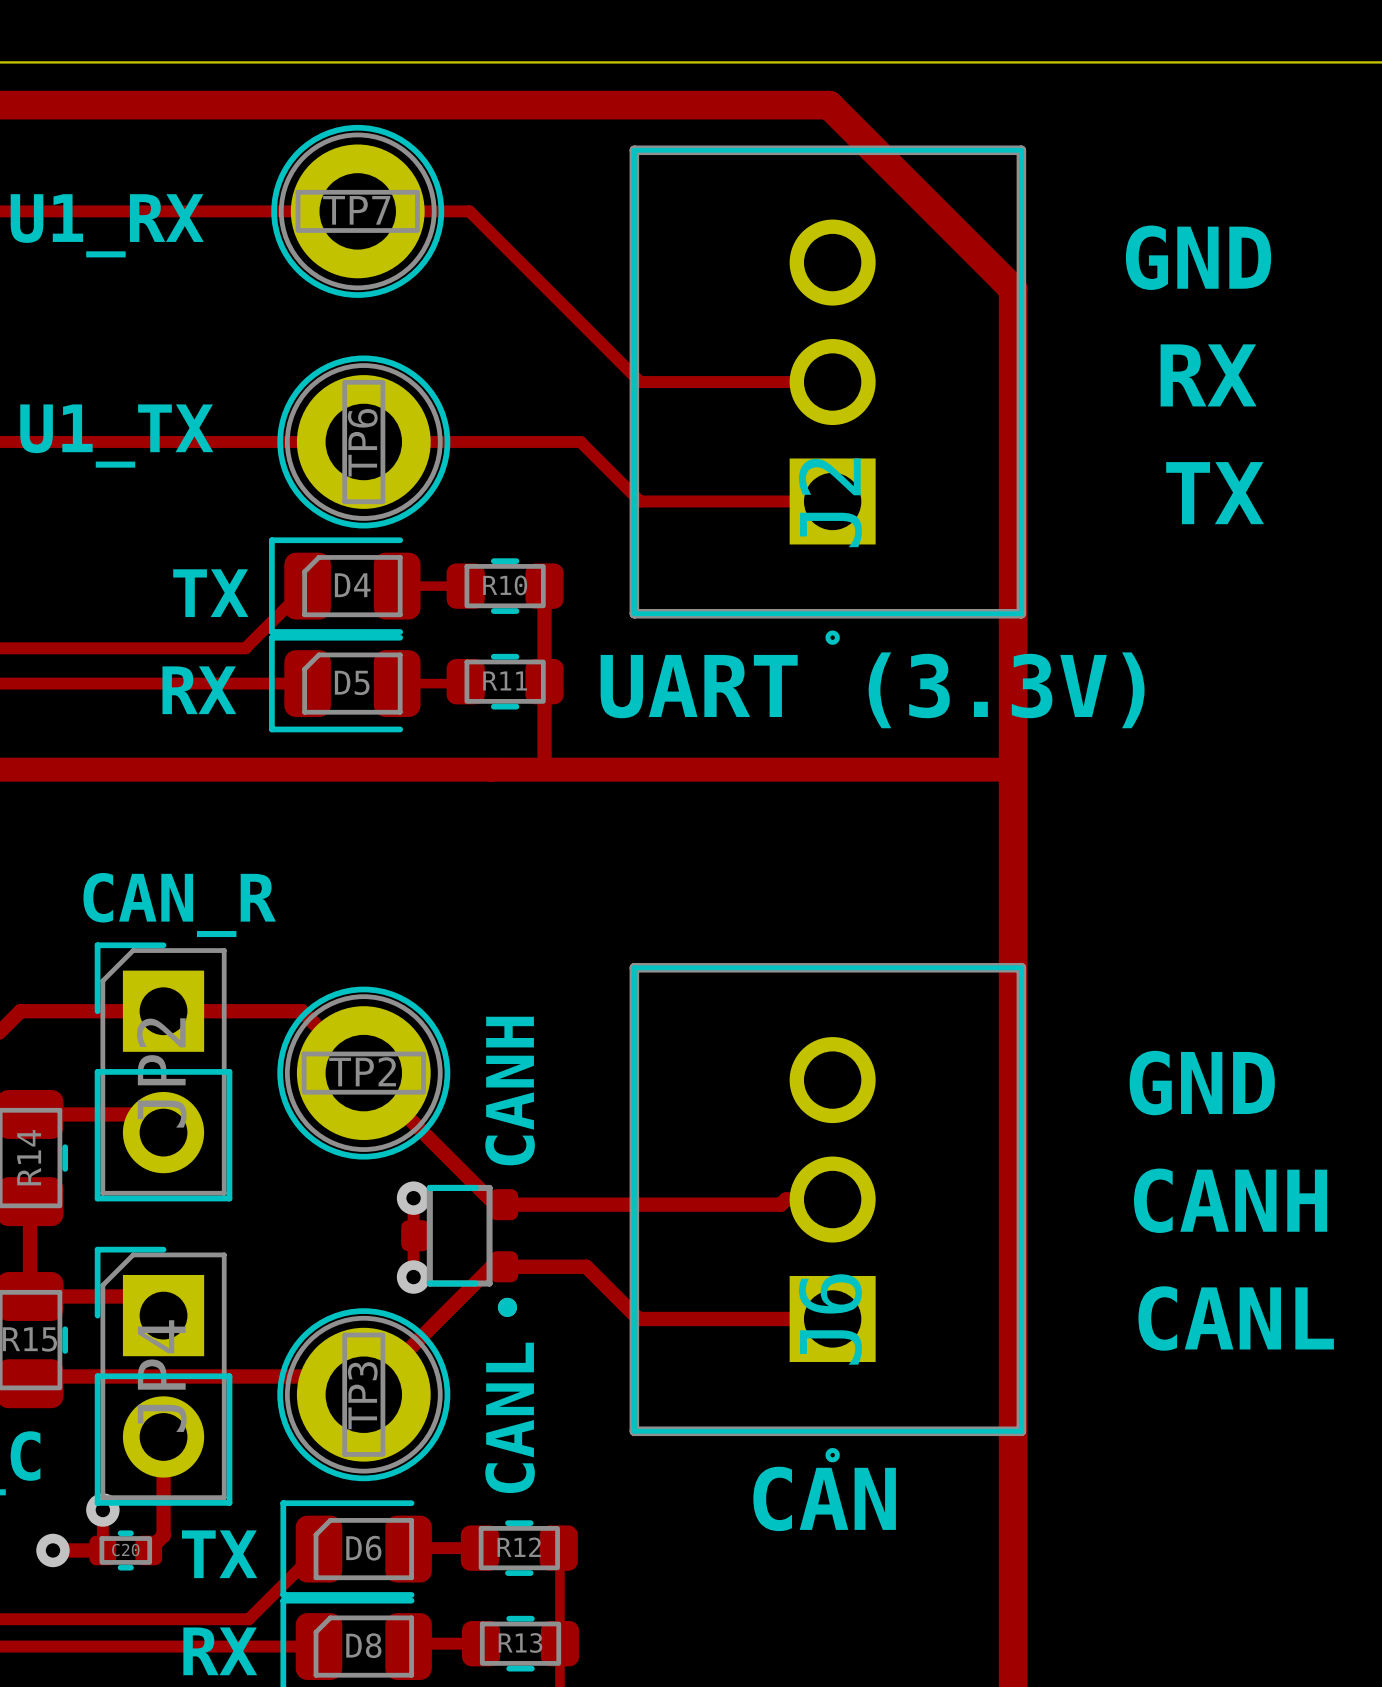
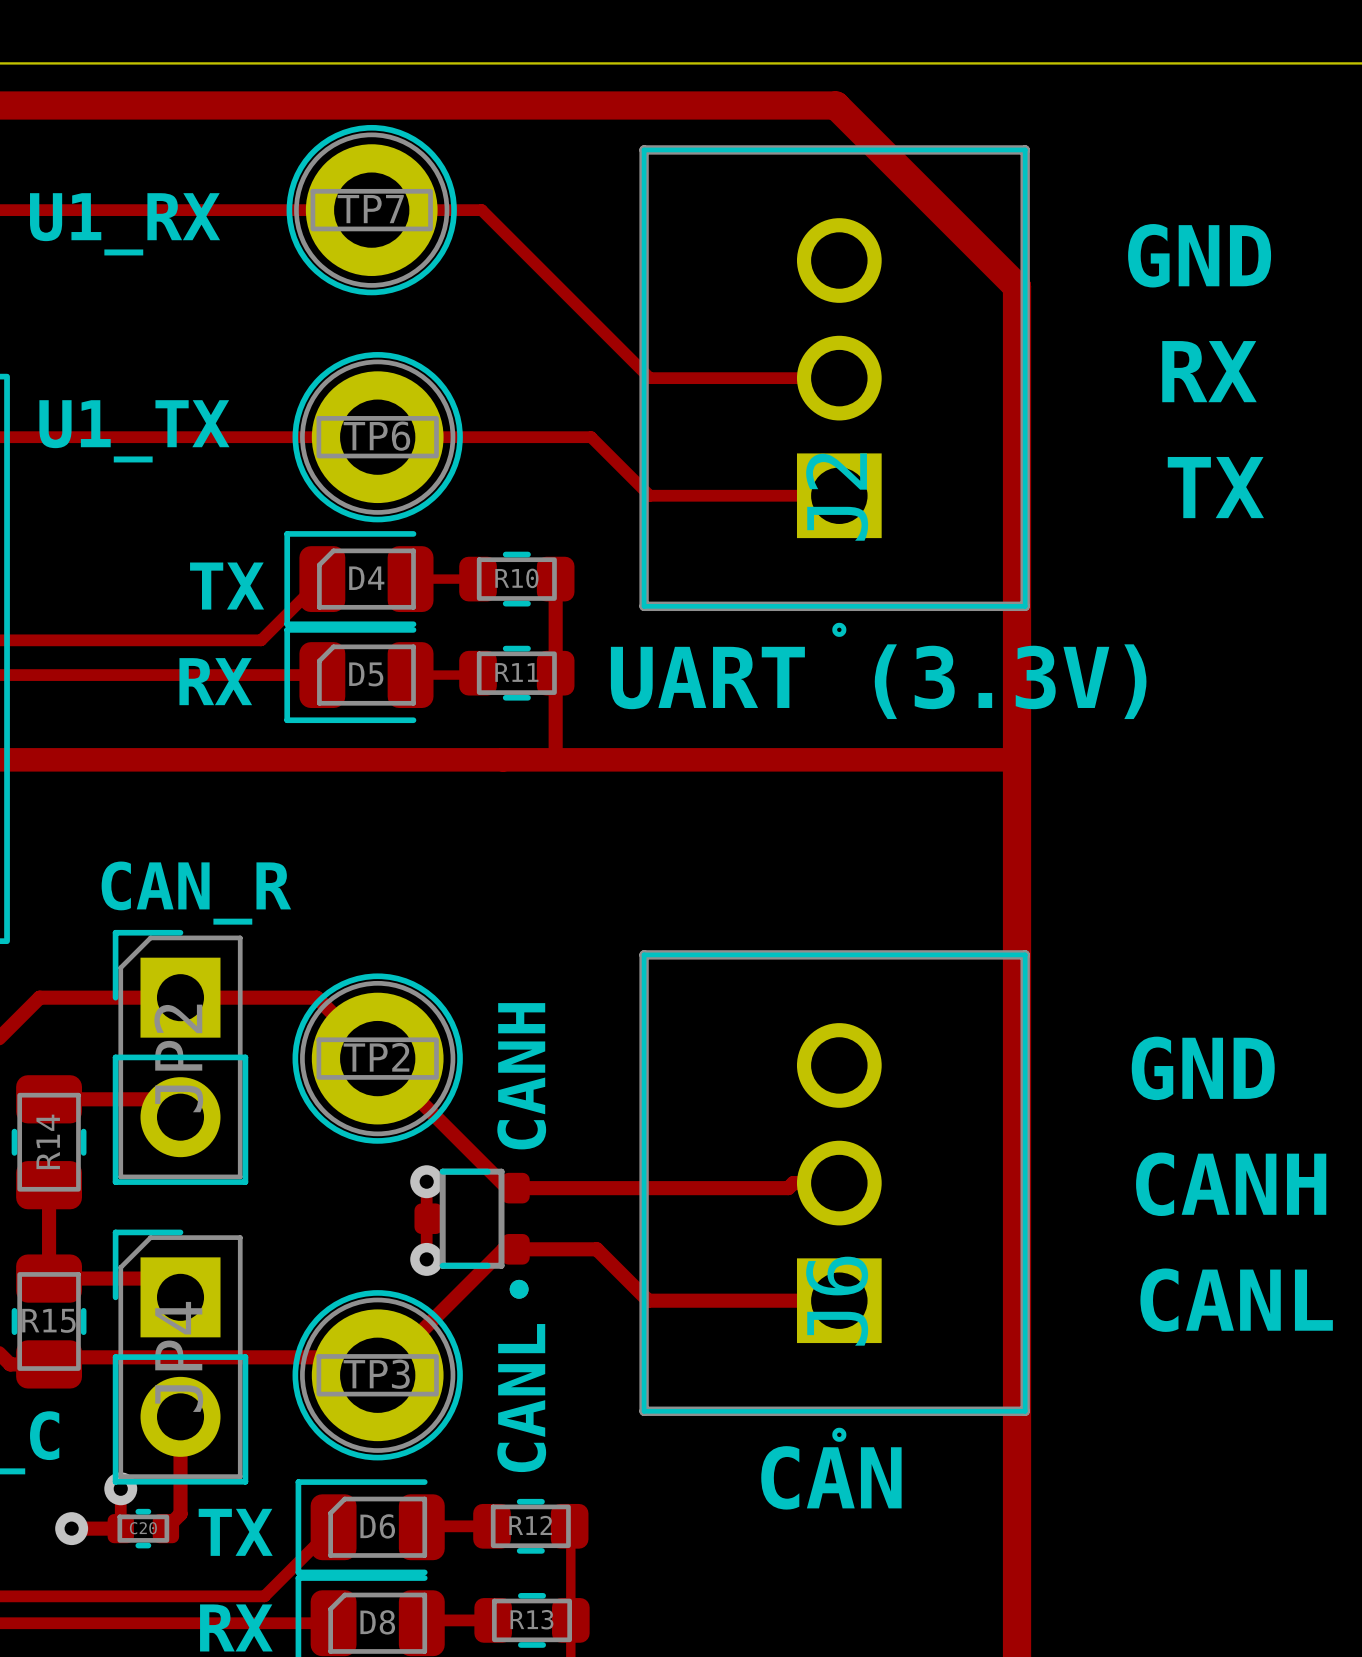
TP6 rotation: 0° (363, 441) -> 90° clockwise (377, 437)
TP3 rotation: 0° (363, 1394) -> 90° clockwise (377, 1375)

